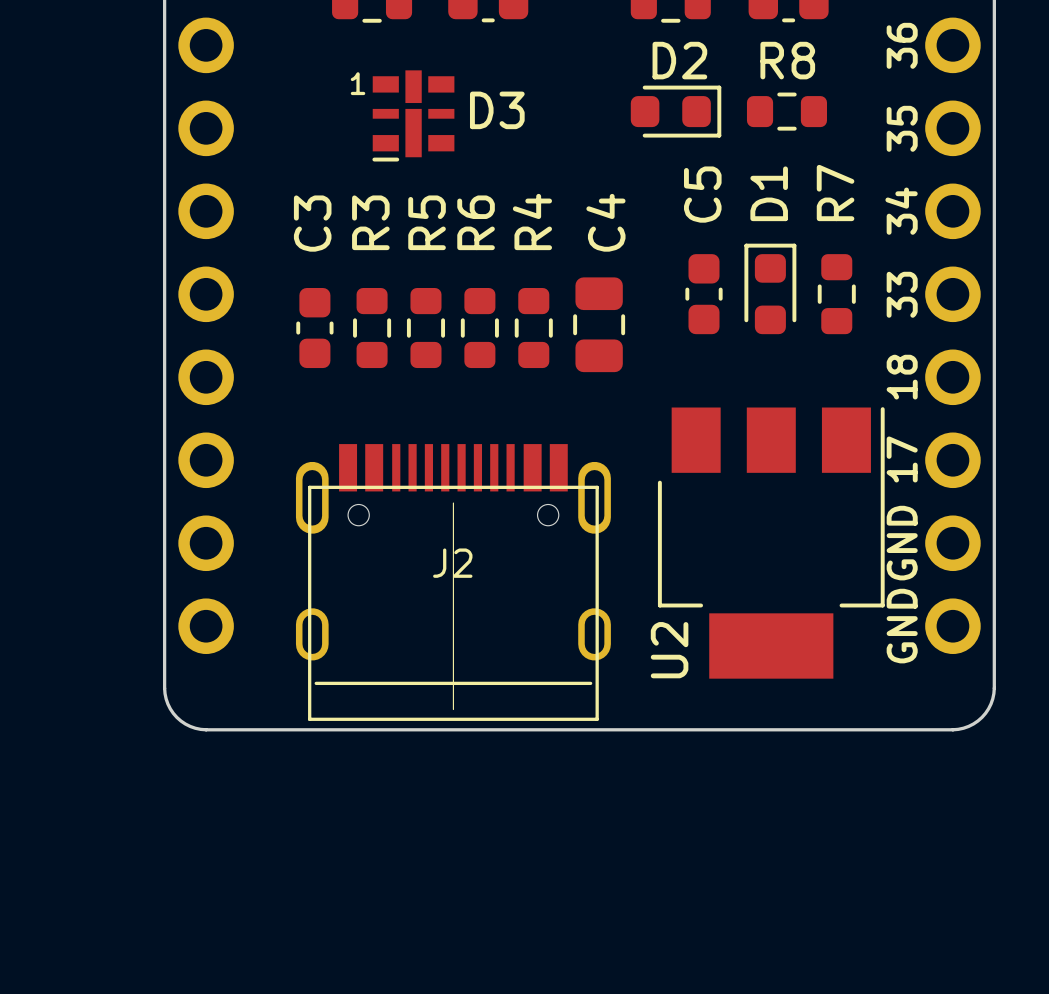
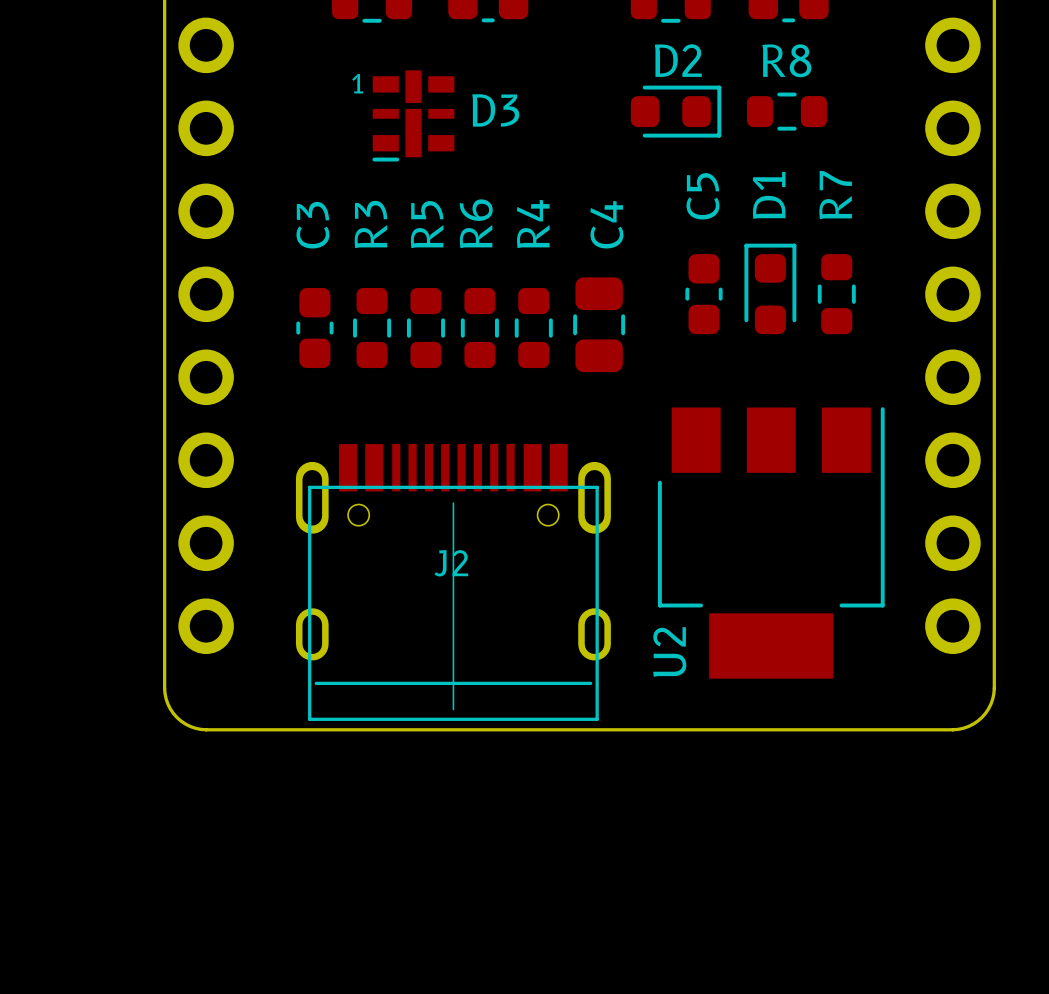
text: 36 (902, 45) -> none
text: 35 (902, 128) -> none
text: 34 (901, 211) -> none
text: 33 (902, 294) -> none
text: 18 (902, 377) -> none
text: 17 (902, 459) -> none
text: GND (902, 543) -> none
text: GND (902, 626) -> none

